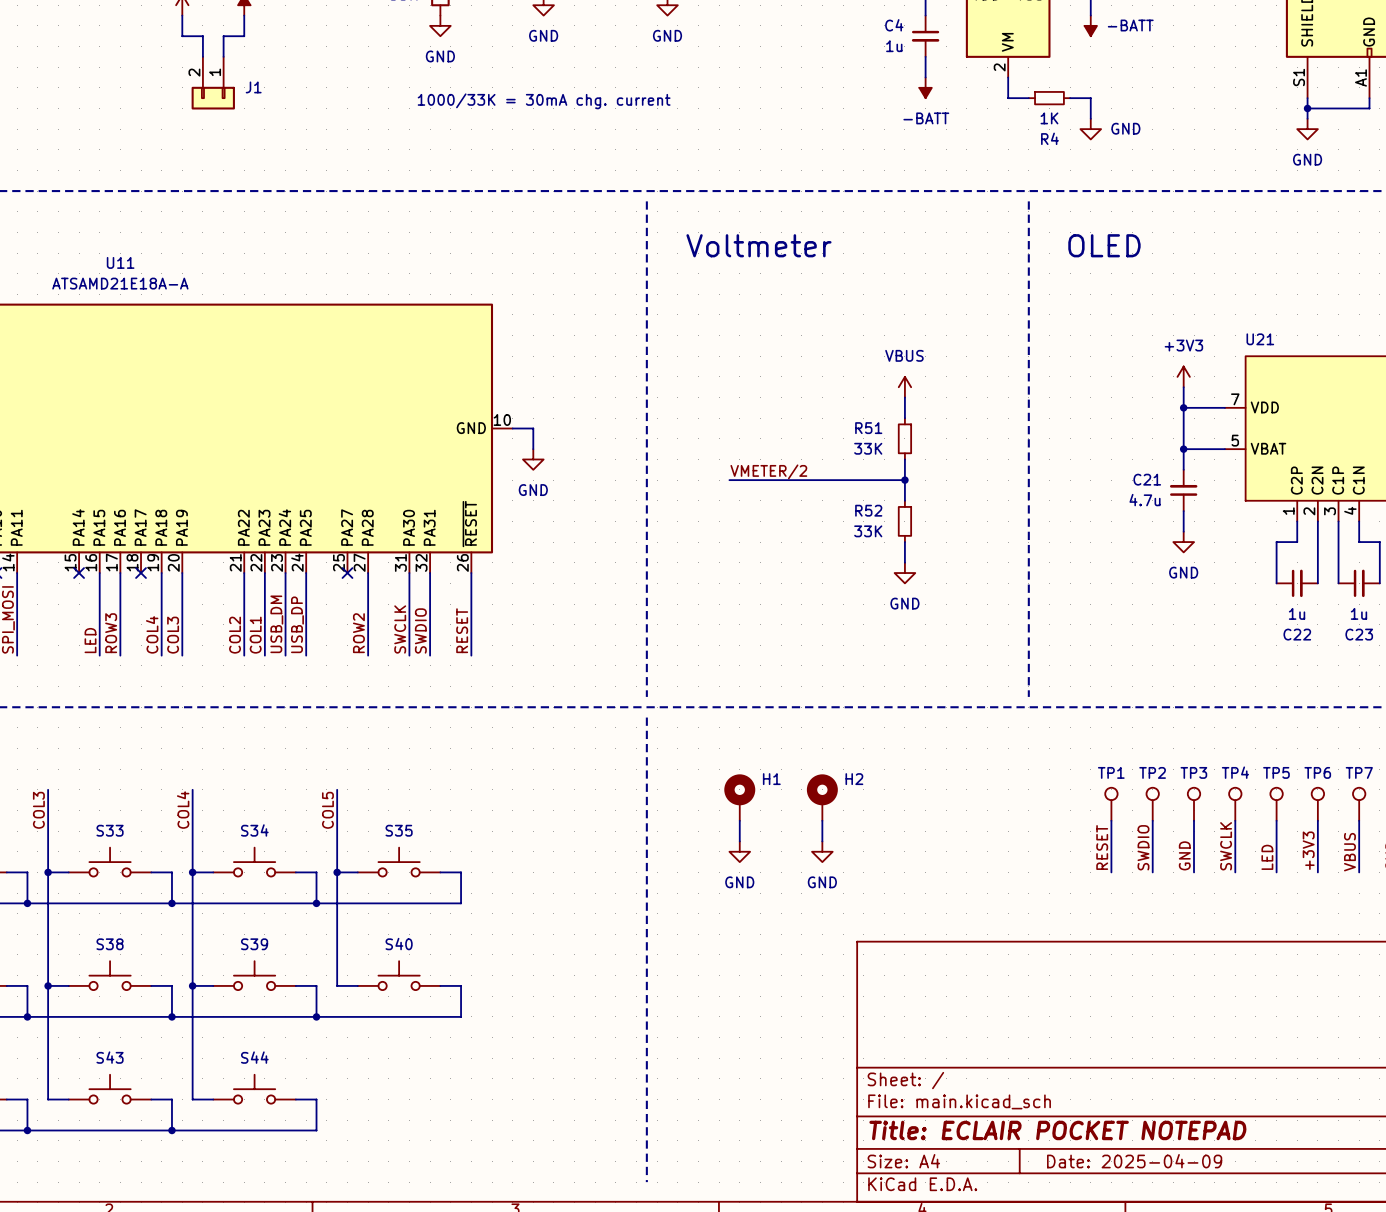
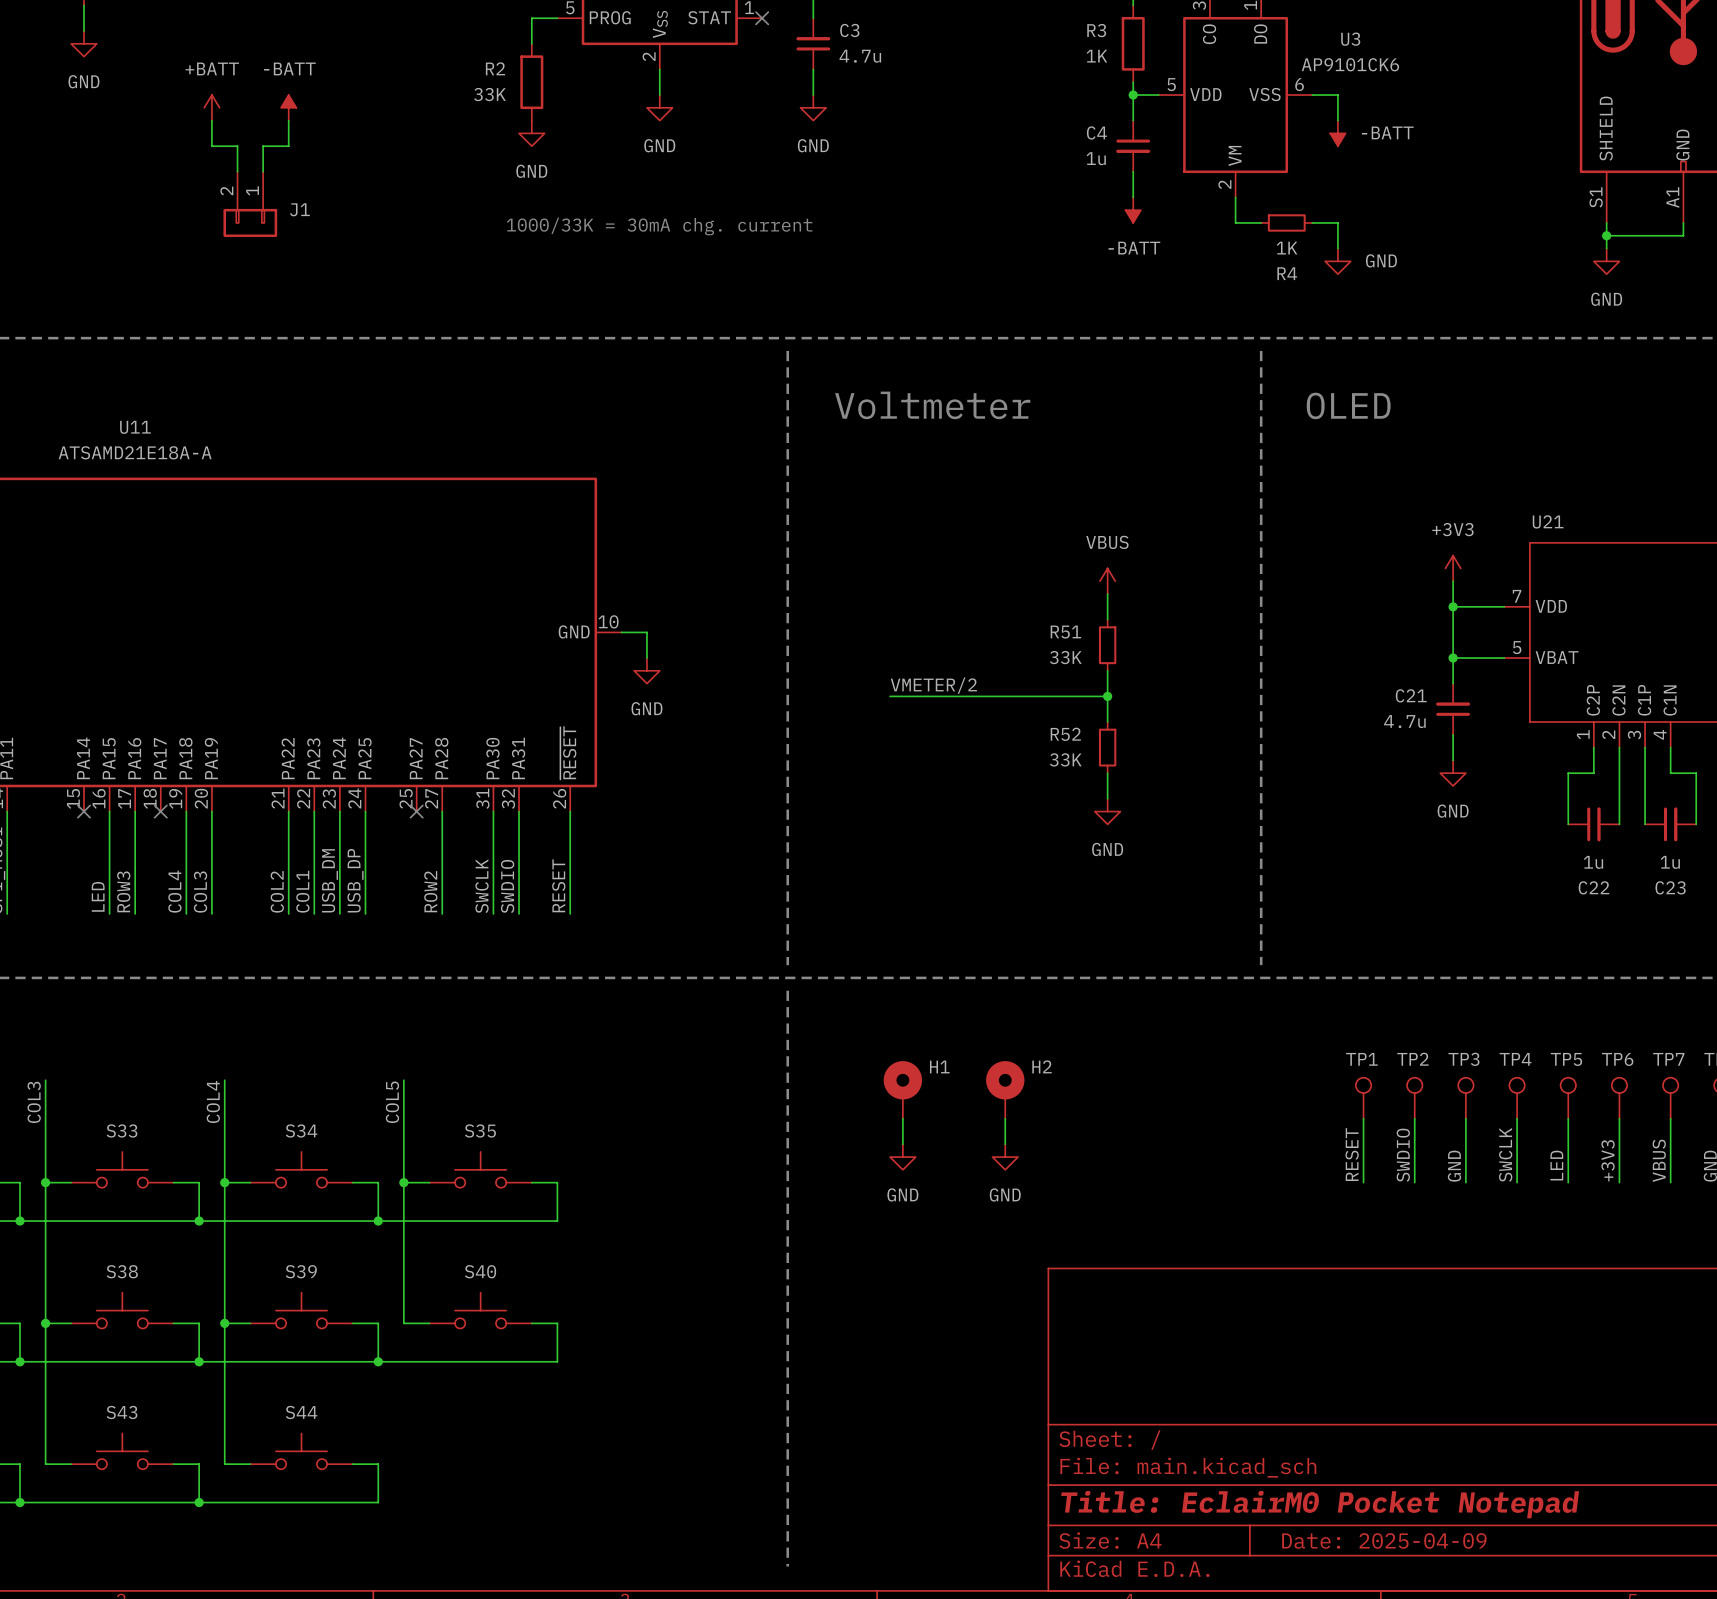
title block: Title: ECLAIR POCKET NOTEPAD (1057, 1130) -> Title: EclairM0 Pocket Notepad (1320, 1504)

